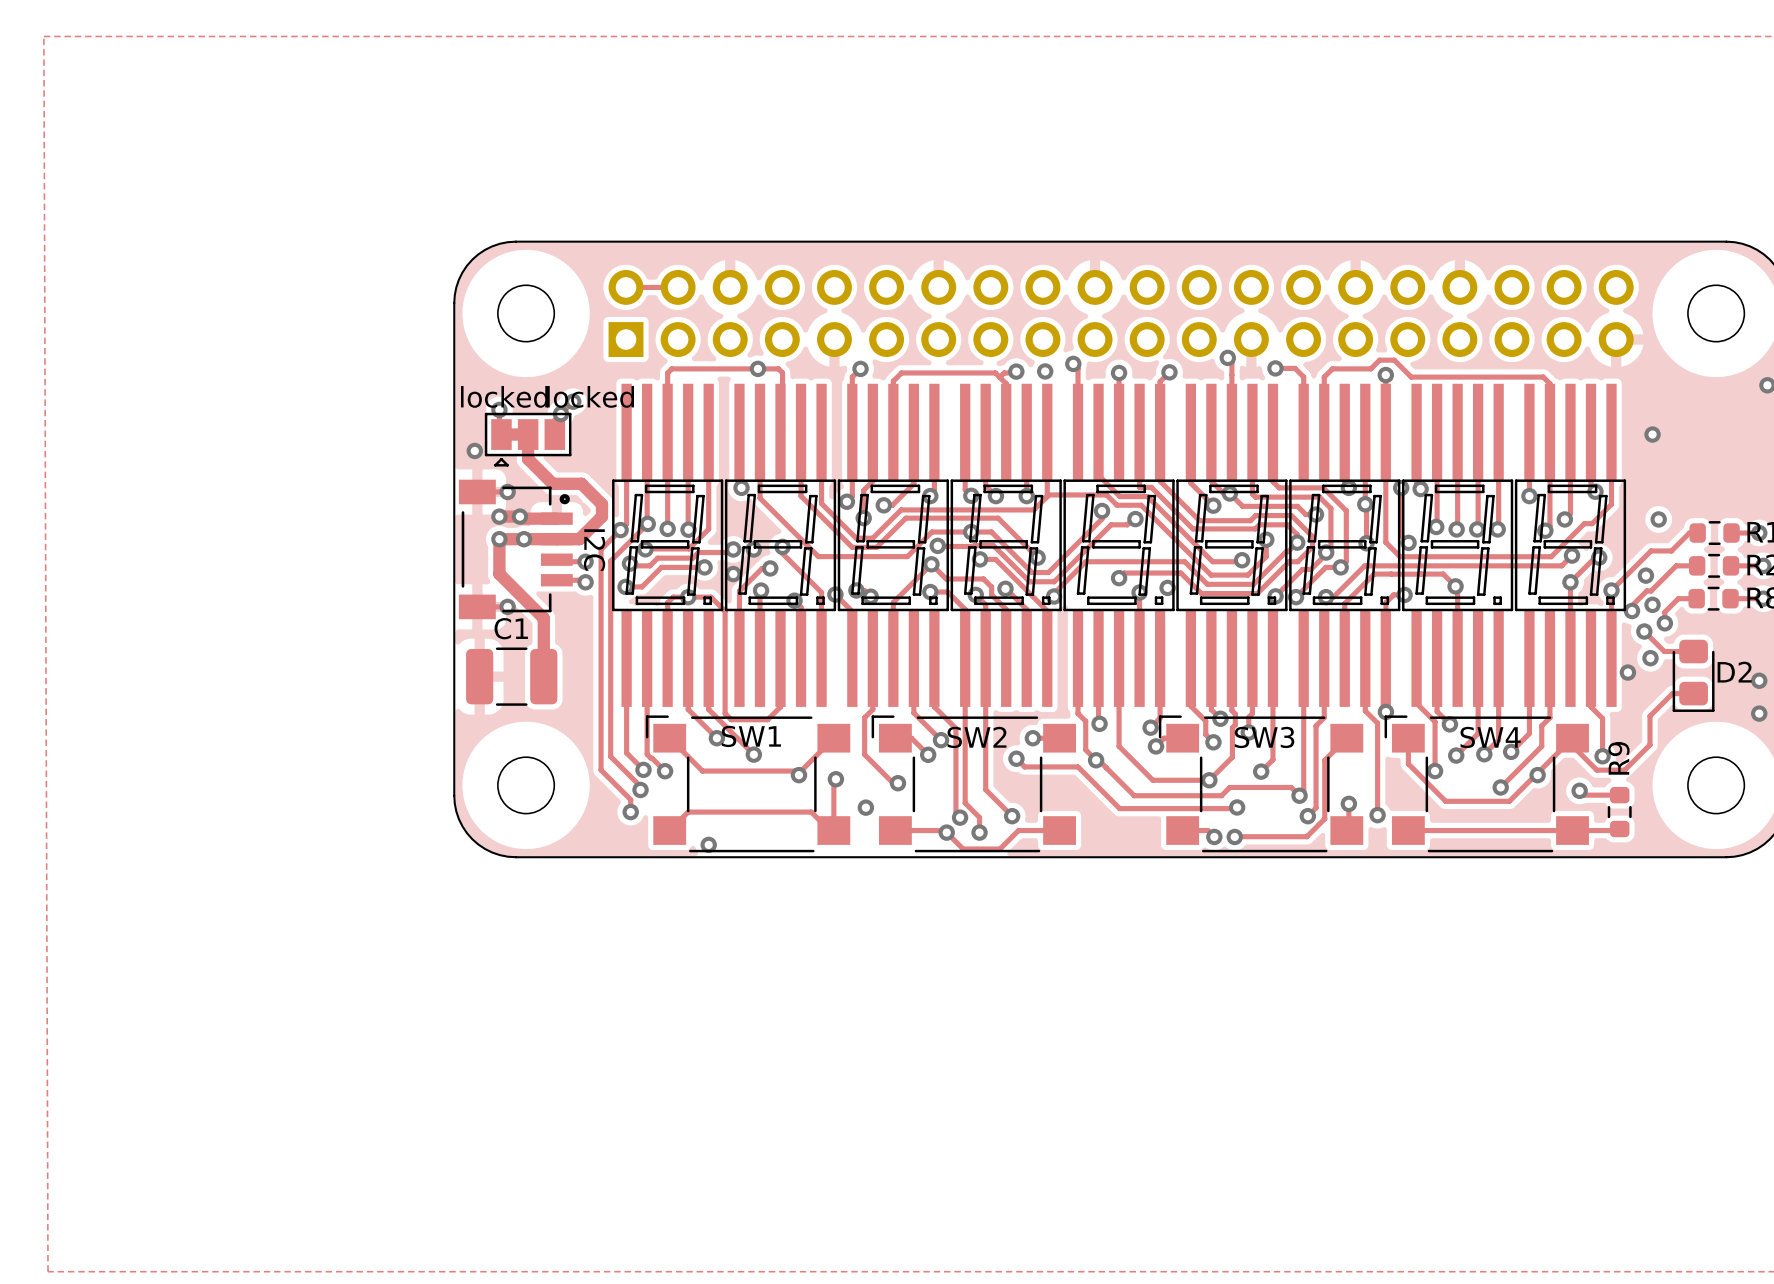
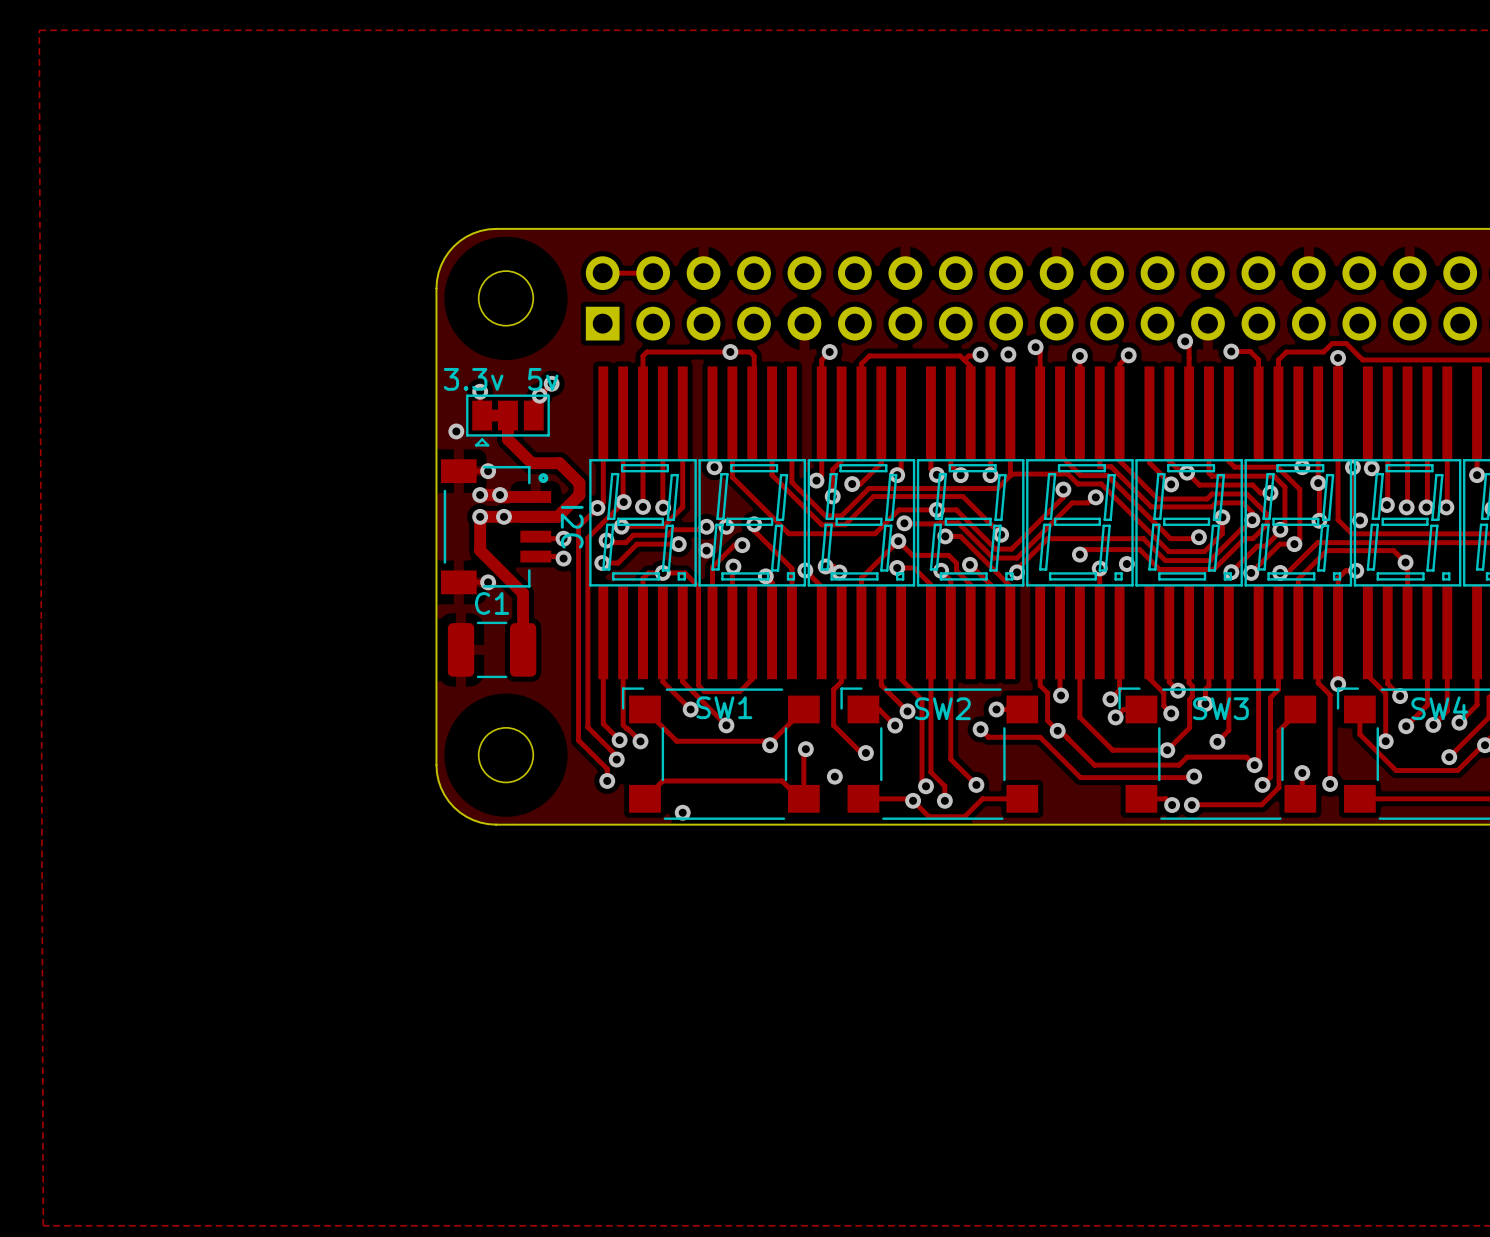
text: locked (504, 396) -> 3.3v (473, 379)
text: locked (590, 396) -> 5v (543, 379)

